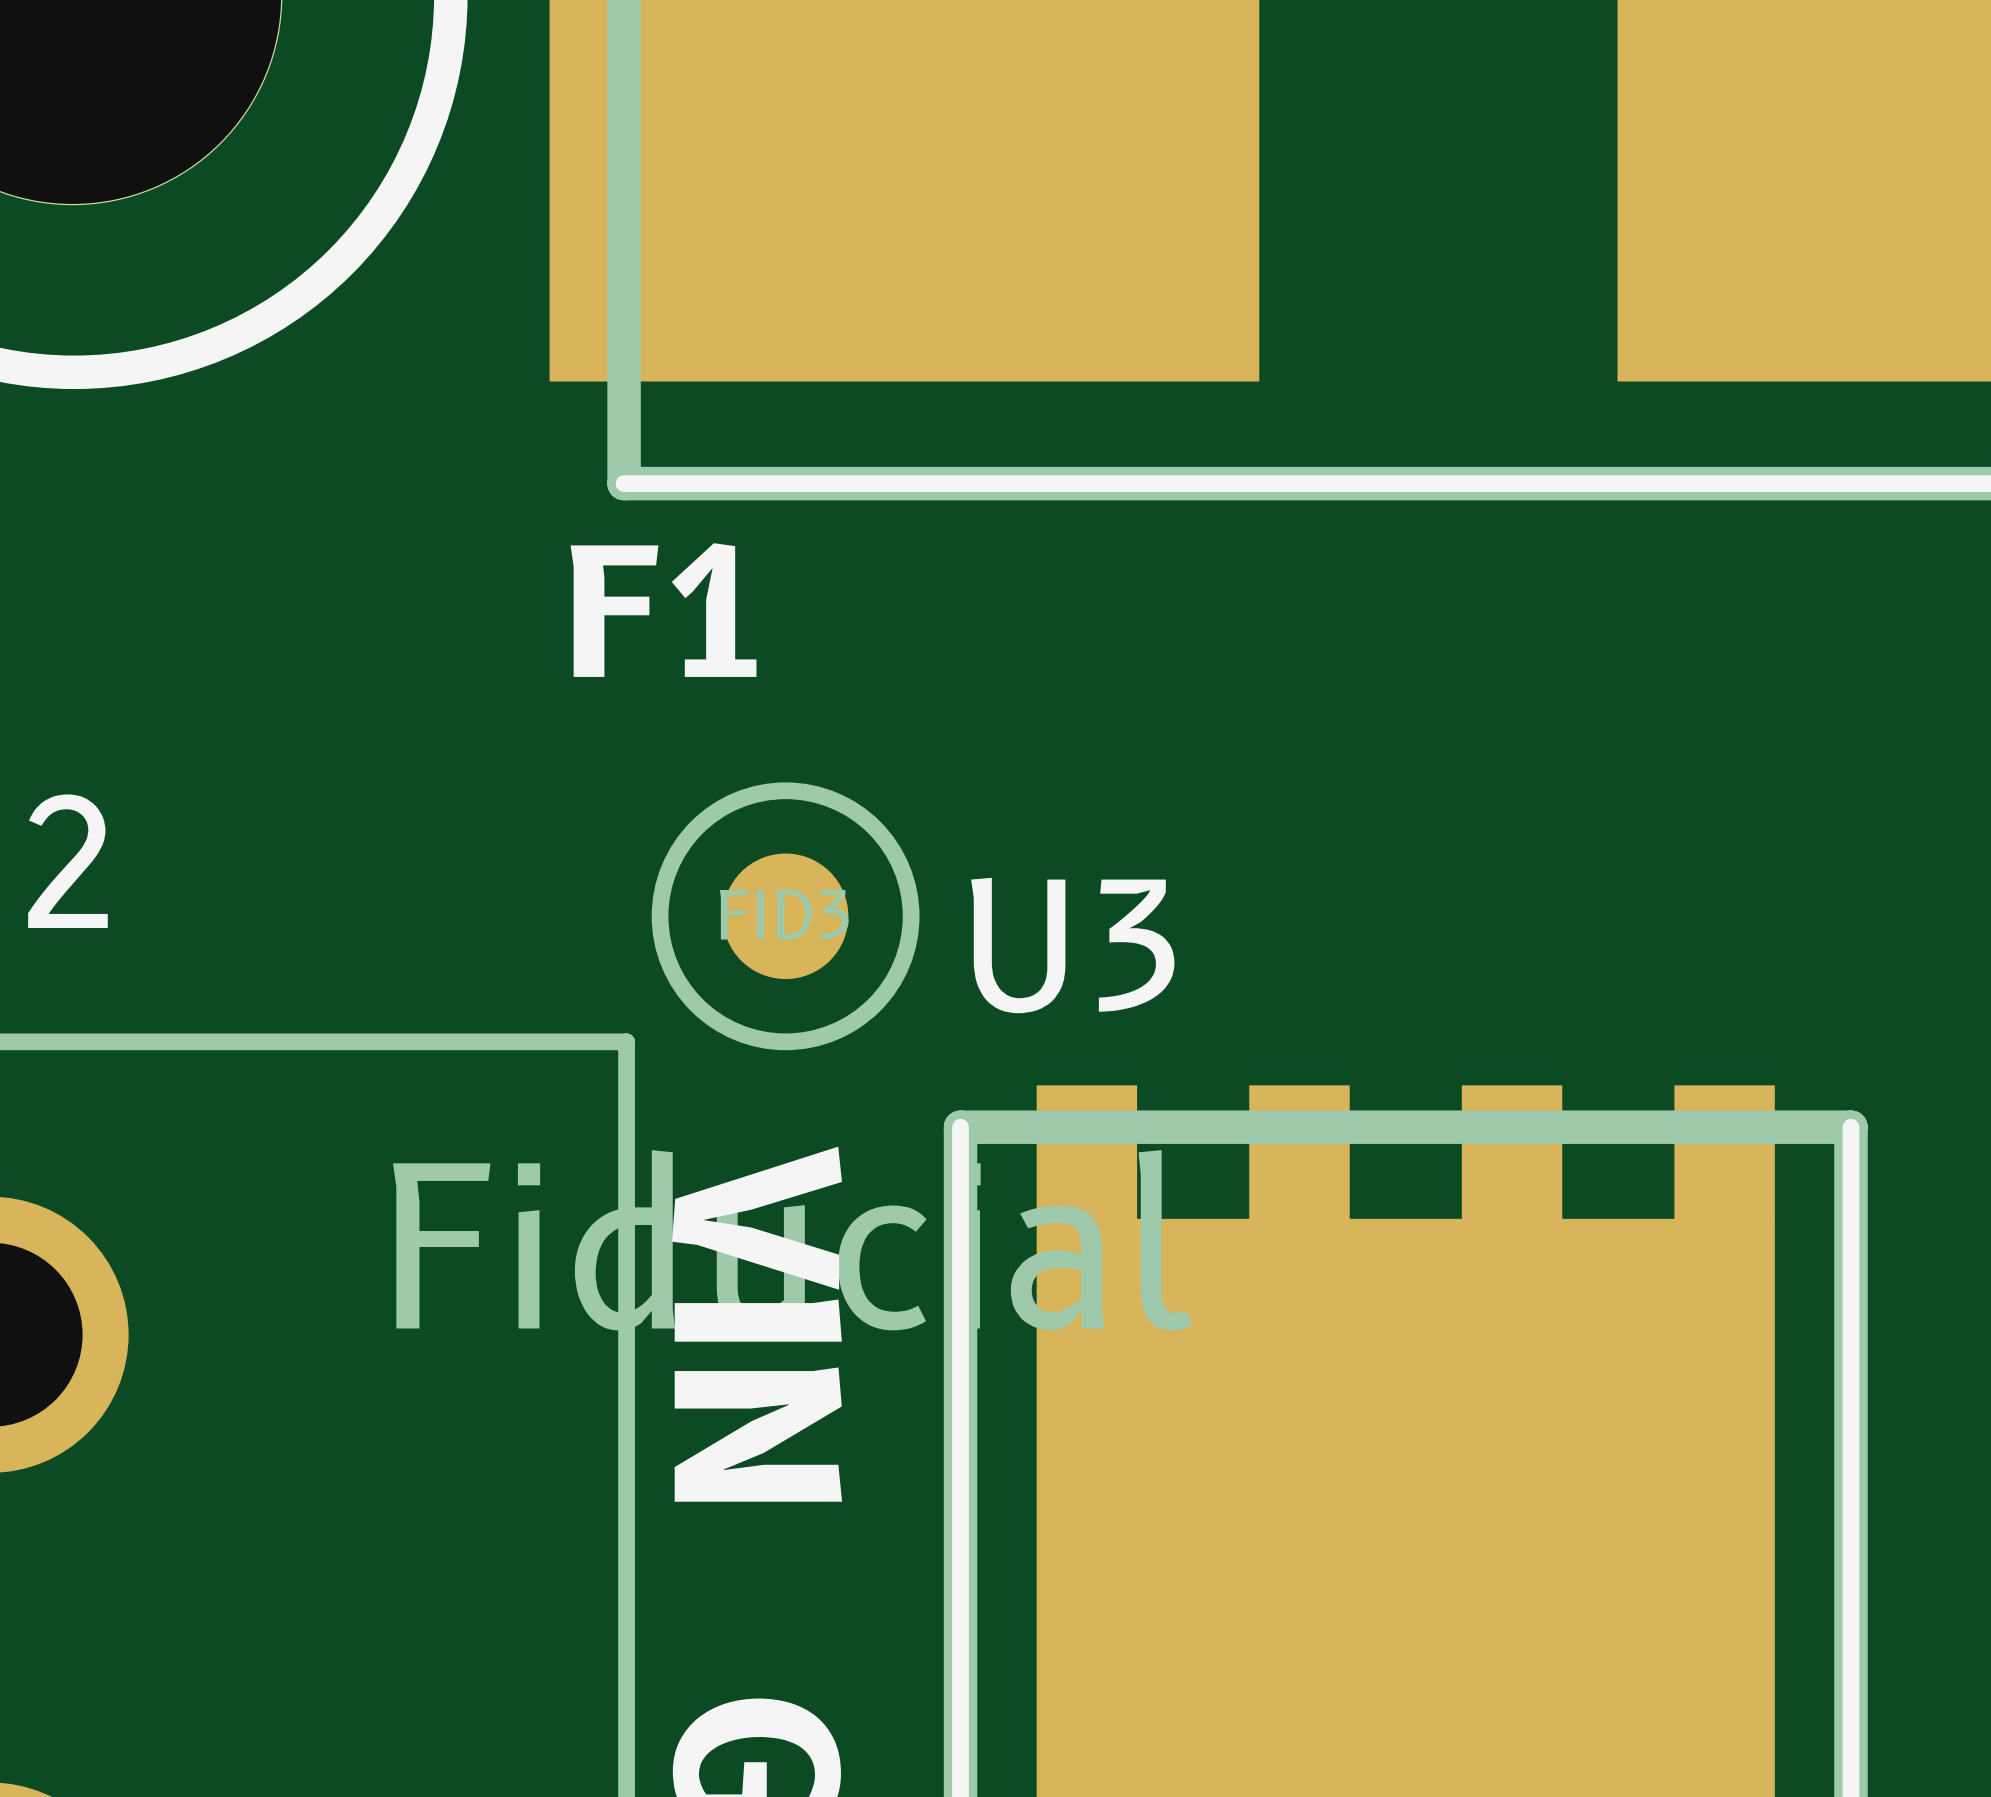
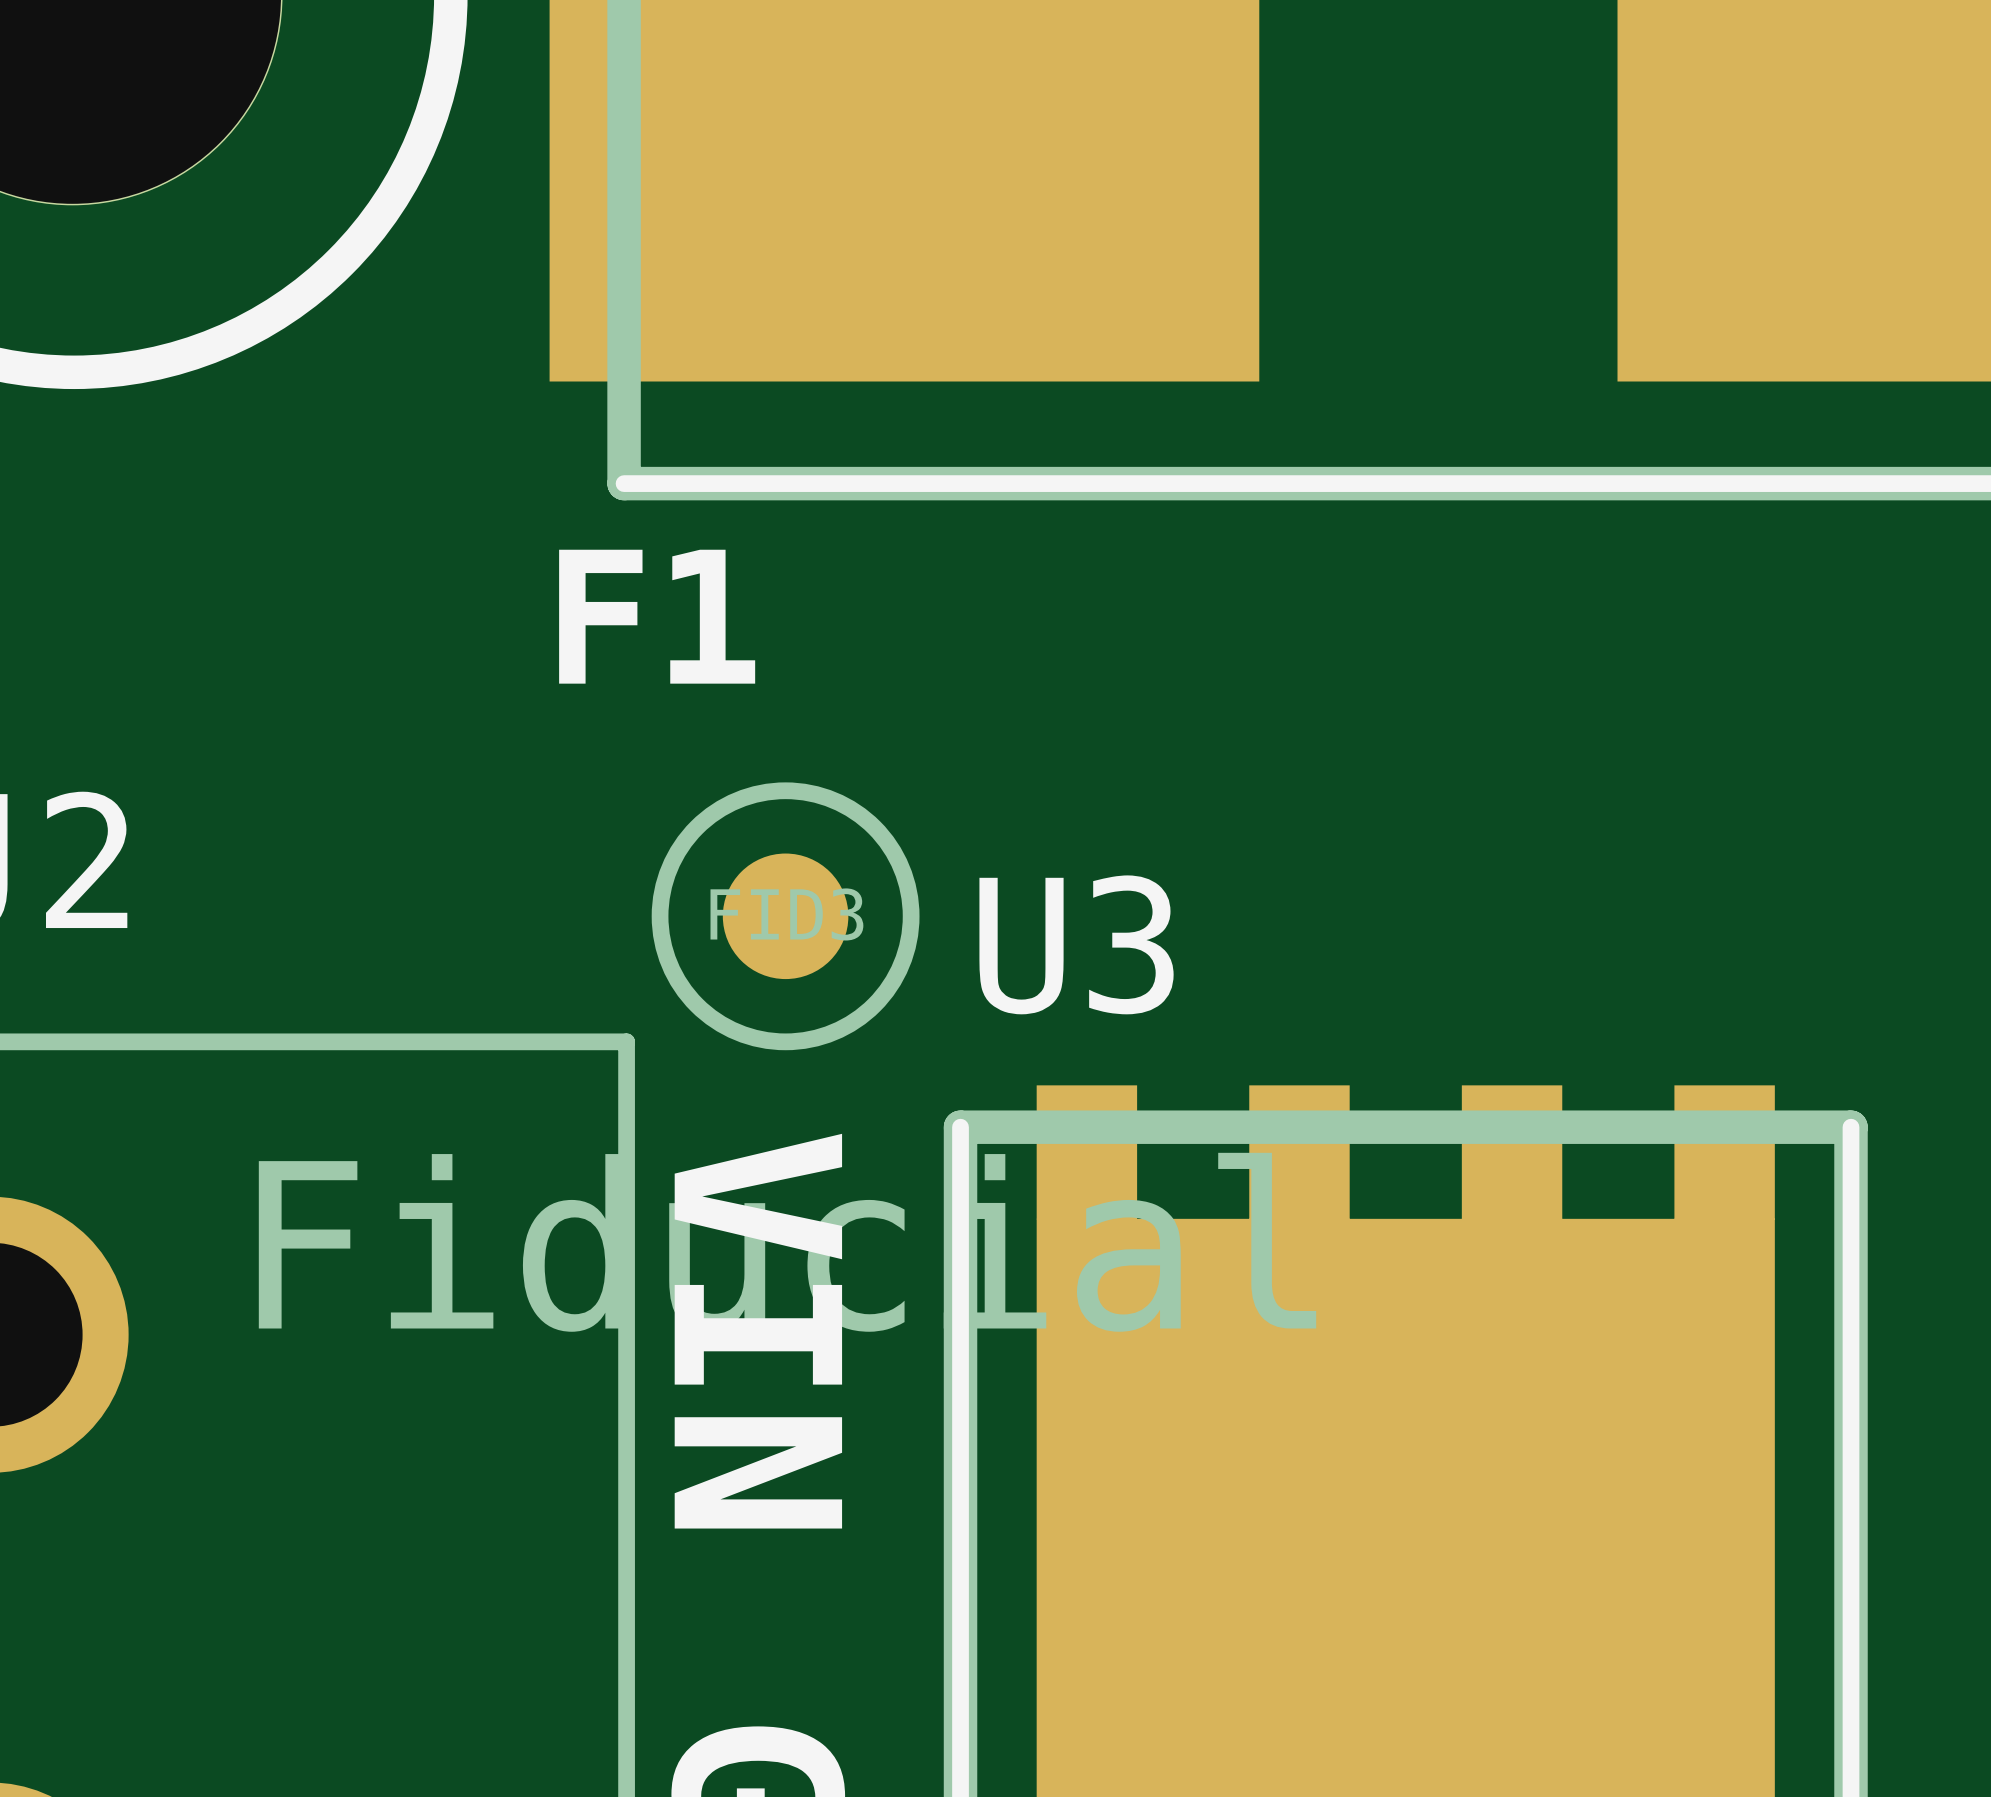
F1 name position: F1 (663, 610) -> F1 (657, 616)

